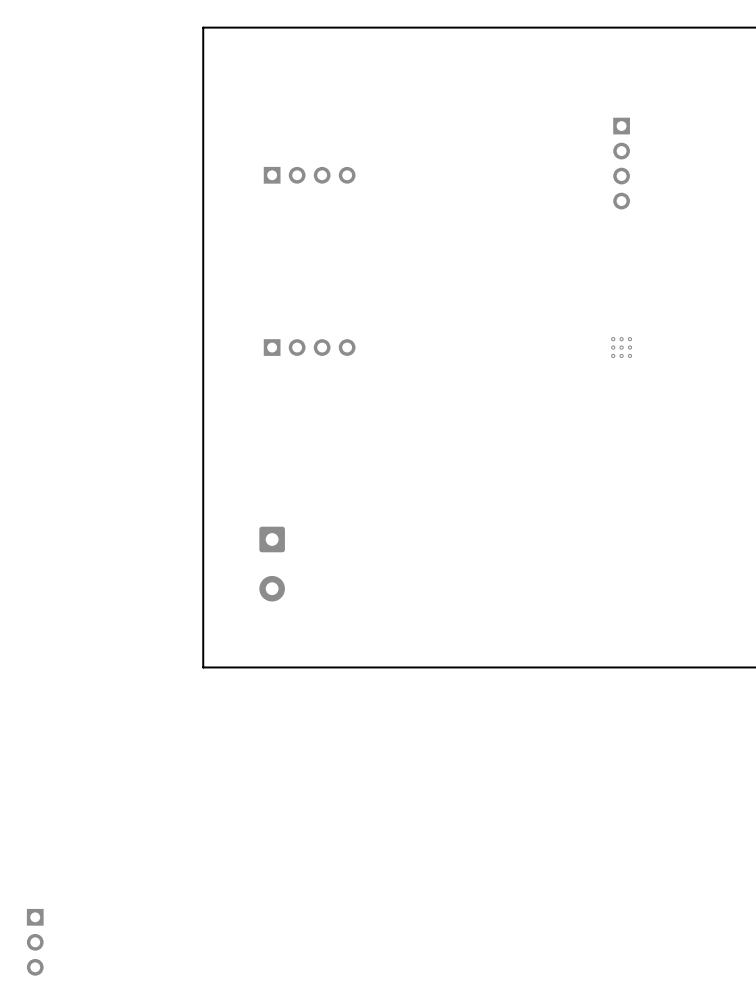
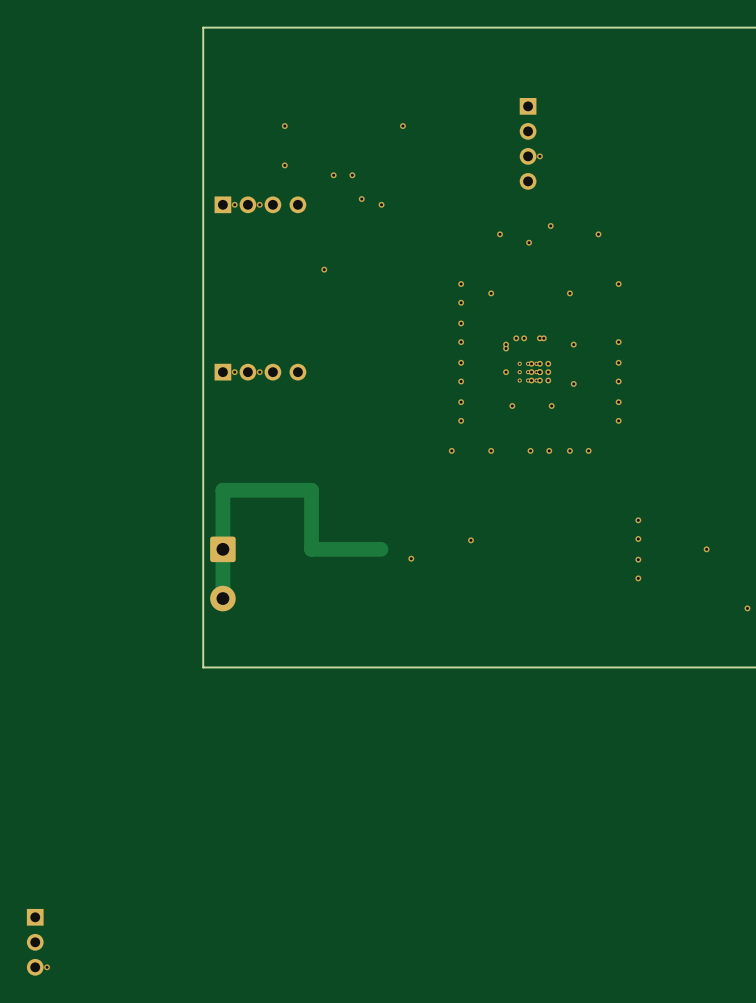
via: none -> (284, 126)
via: none -> (402, 126)
via: none -> (539, 156)
part position: (621, 163) -> (528, 143)
via: none -> (284, 165)
part position: (309, 175) -> (260, 204)
via: none -> (333, 175)
via: none -> (352, 175)
via: none -> (361, 199)
via: none -> (234, 204)
via: none -> (259, 204)
via: none -> (381, 204)
via: none -> (550, 225)
via: none -> (500, 234)
via: none -> (598, 234)
via: none -> (529, 242)
via: none -> (324, 269)
via: none -> (461, 284)
via: none -> (618, 284)
via: none -> (491, 293)
via: none -> (569, 293)
via: none -> (461, 302)
via: none -> (461, 323)
via: none -> (516, 338)
via: none -> (524, 338)
via: none -> (539, 338)
via: none -> (543, 338)
via: none -> (461, 342)
via: none -> (618, 342)
via: none -> (506, 344)
via: none -> (573, 344)
part position: (309, 347) -> (260, 372)
part position: (621, 347) -> (528, 372)
via: none -> (506, 348)
via: none -> (461, 362)
via: none -> (618, 362)
via: none -> (531, 363)
via: none -> (539, 363)
via: none -> (548, 363)
via: none -> (234, 372)
via: none -> (259, 372)
via: none -> (506, 372)
via: none -> (531, 372)
via: none -> (539, 372)
via: none -> (548, 372)
via: none -> (531, 380)
via: none -> (539, 380)
via: none -> (548, 380)
via: none -> (461, 381)
via: none -> (618, 381)
via: none -> (573, 383)
via: none -> (461, 402)
via: none -> (618, 402)
via: none -> (512, 405)
via: none -> (551, 405)
via: none -> (461, 420)
via: none -> (618, 420)
via: none -> (451, 450)
via: none -> (491, 450)
via: none -> (530, 450)
via: none -> (549, 450)
via: none -> (569, 450)
via: none -> (588, 450)
via: none -> (638, 520)
via: none -> (638, 539)
via: none -> (470, 540)
track: none -> (381, 549) (311, 549) (311, 490) (222, 490) (222, 598)
via: none -> (706, 549)
via: none -> (411, 558)
via: none -> (638, 559)
part position: (272, 564) -> (222, 573)
via: none -> (638, 578)
via: none -> (747, 608)
via: none -> (47, 967)

